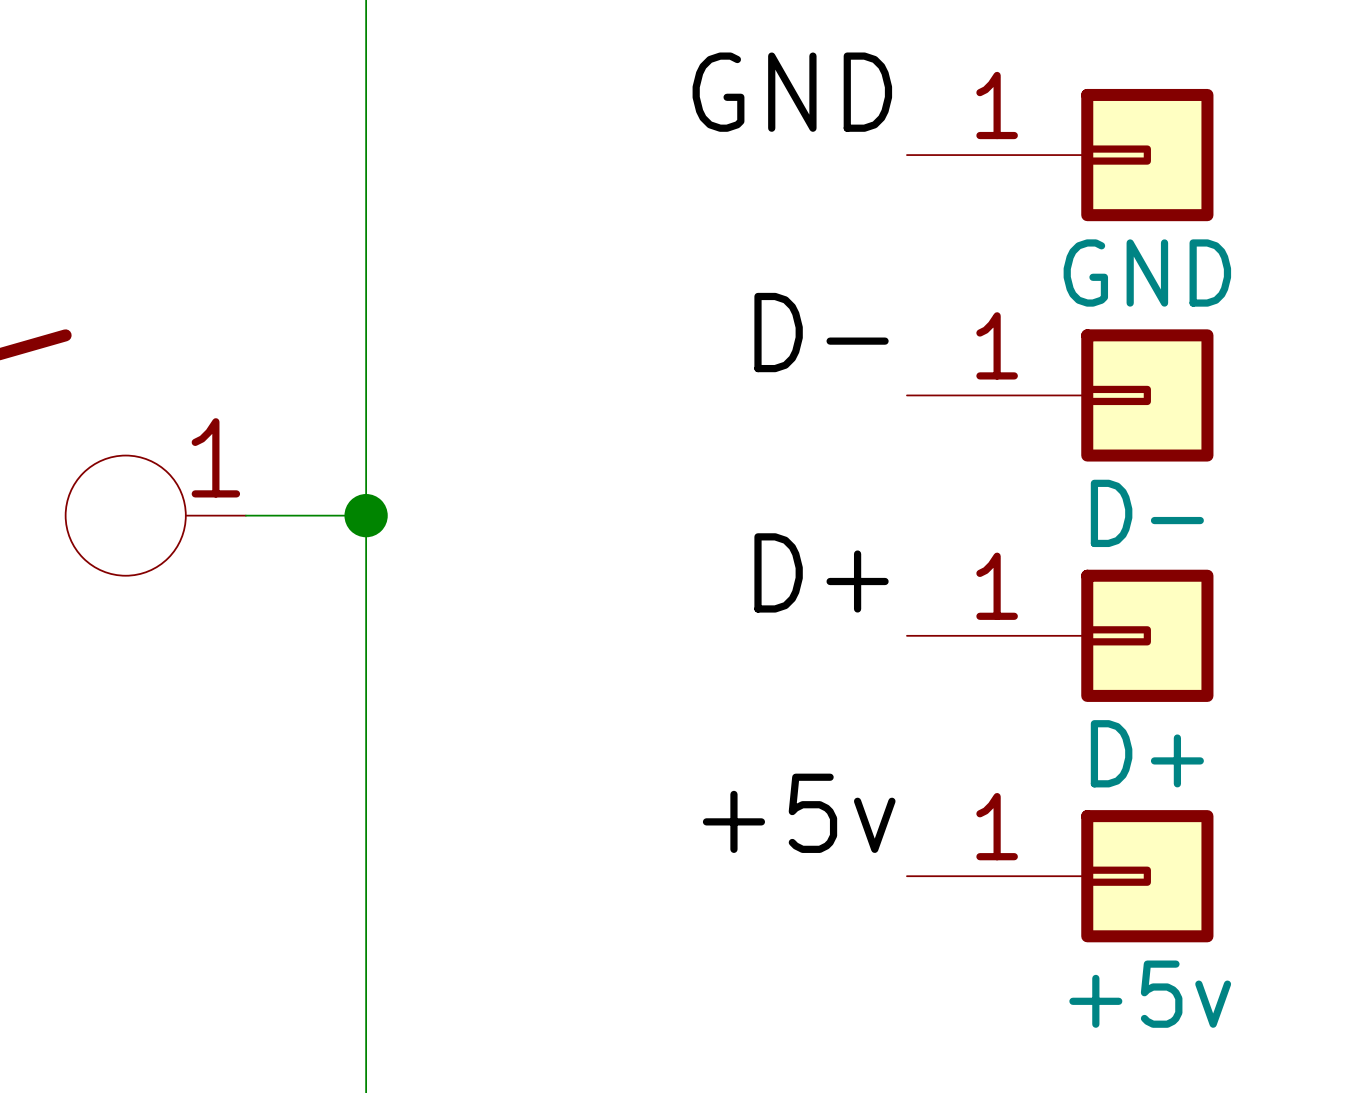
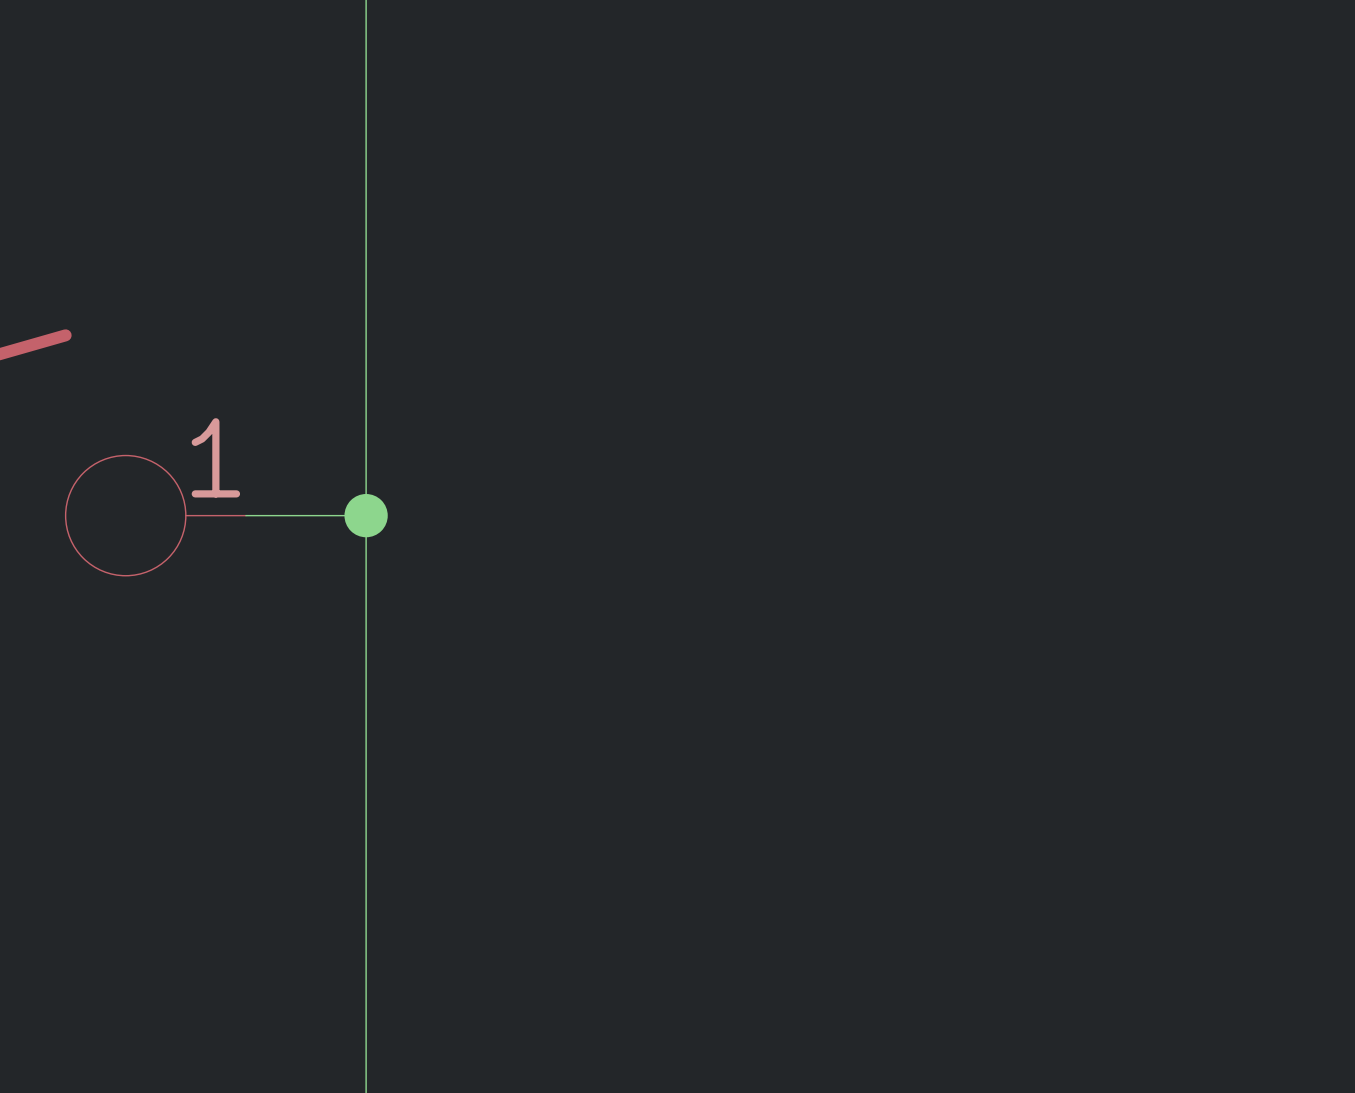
label: GND (792, 92) -> none
part: GND (1060, 155) -> none
label: D- (821, 332) -> none
part: D- (1060, 395) -> none
label: D+ (821, 572) -> none
part: D+ (1060, 635) -> none
label: +5v (799, 813) -> none
part: +5v (1060, 876) -> none

